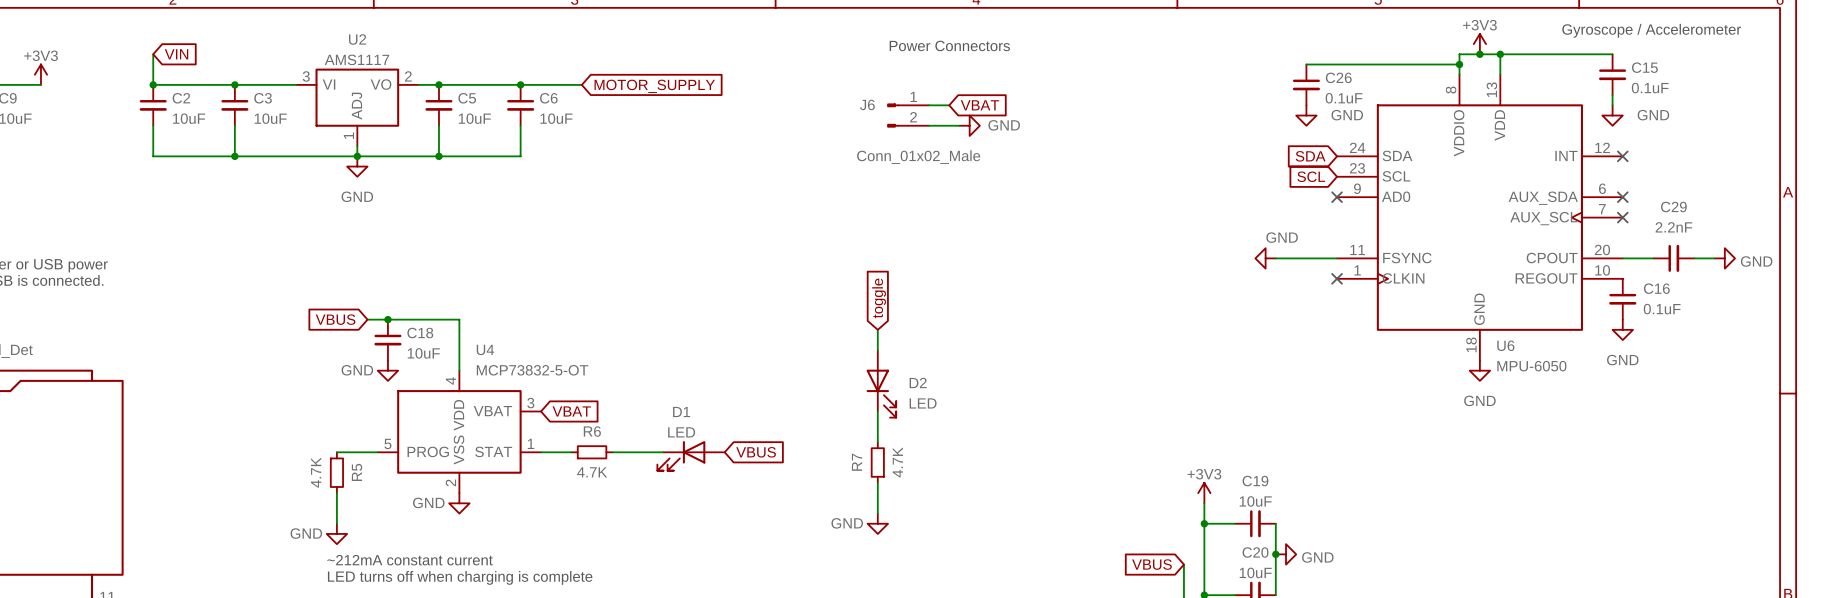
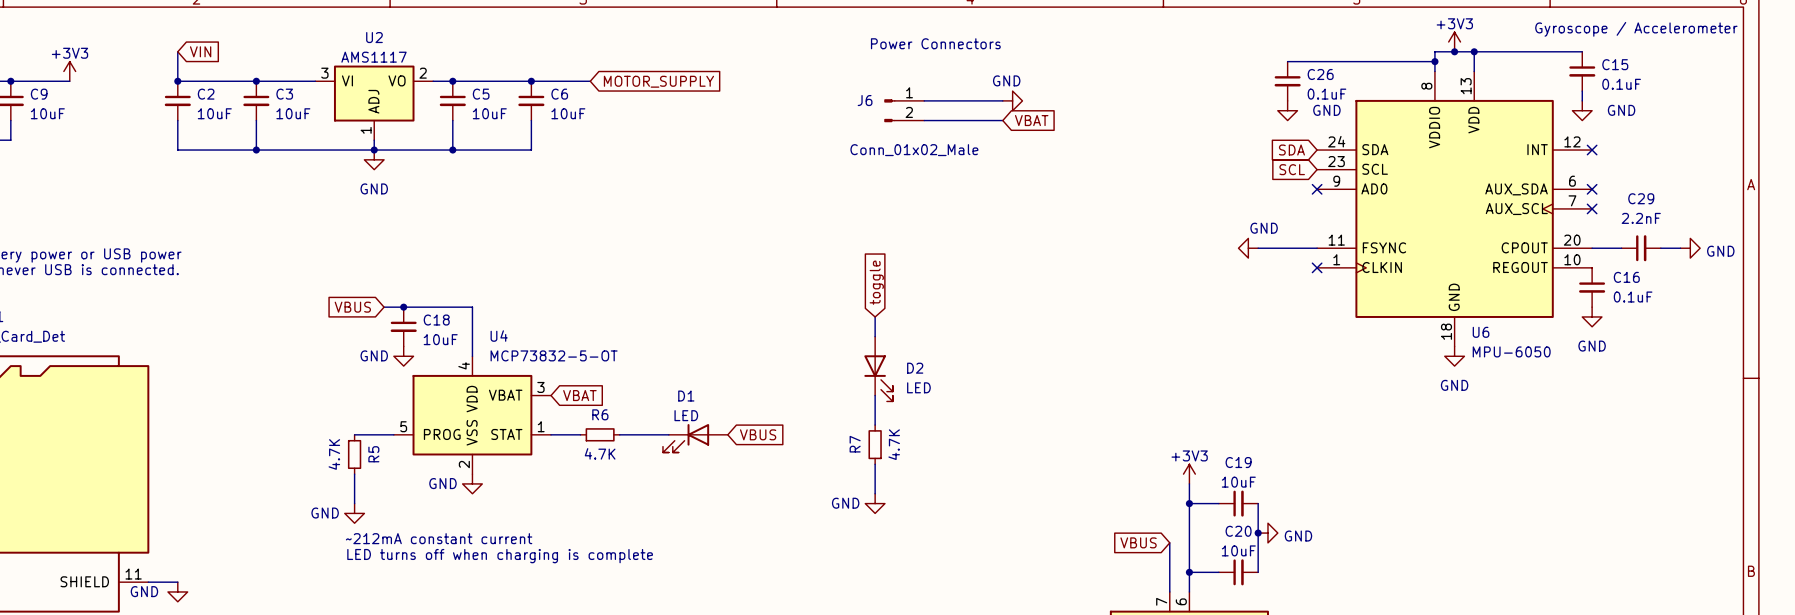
wire: none -> (943, 100) (1002, 100)
global label position: VBAT (979, 105) -> VBAT (1031, 120)
wire: none -> (953, 120) (1002, 120)
power symbol position: GND (969, 125) -> GND (1012, 100)
power symbol text position: GND (1004, 125) -> GND (1006, 80)

